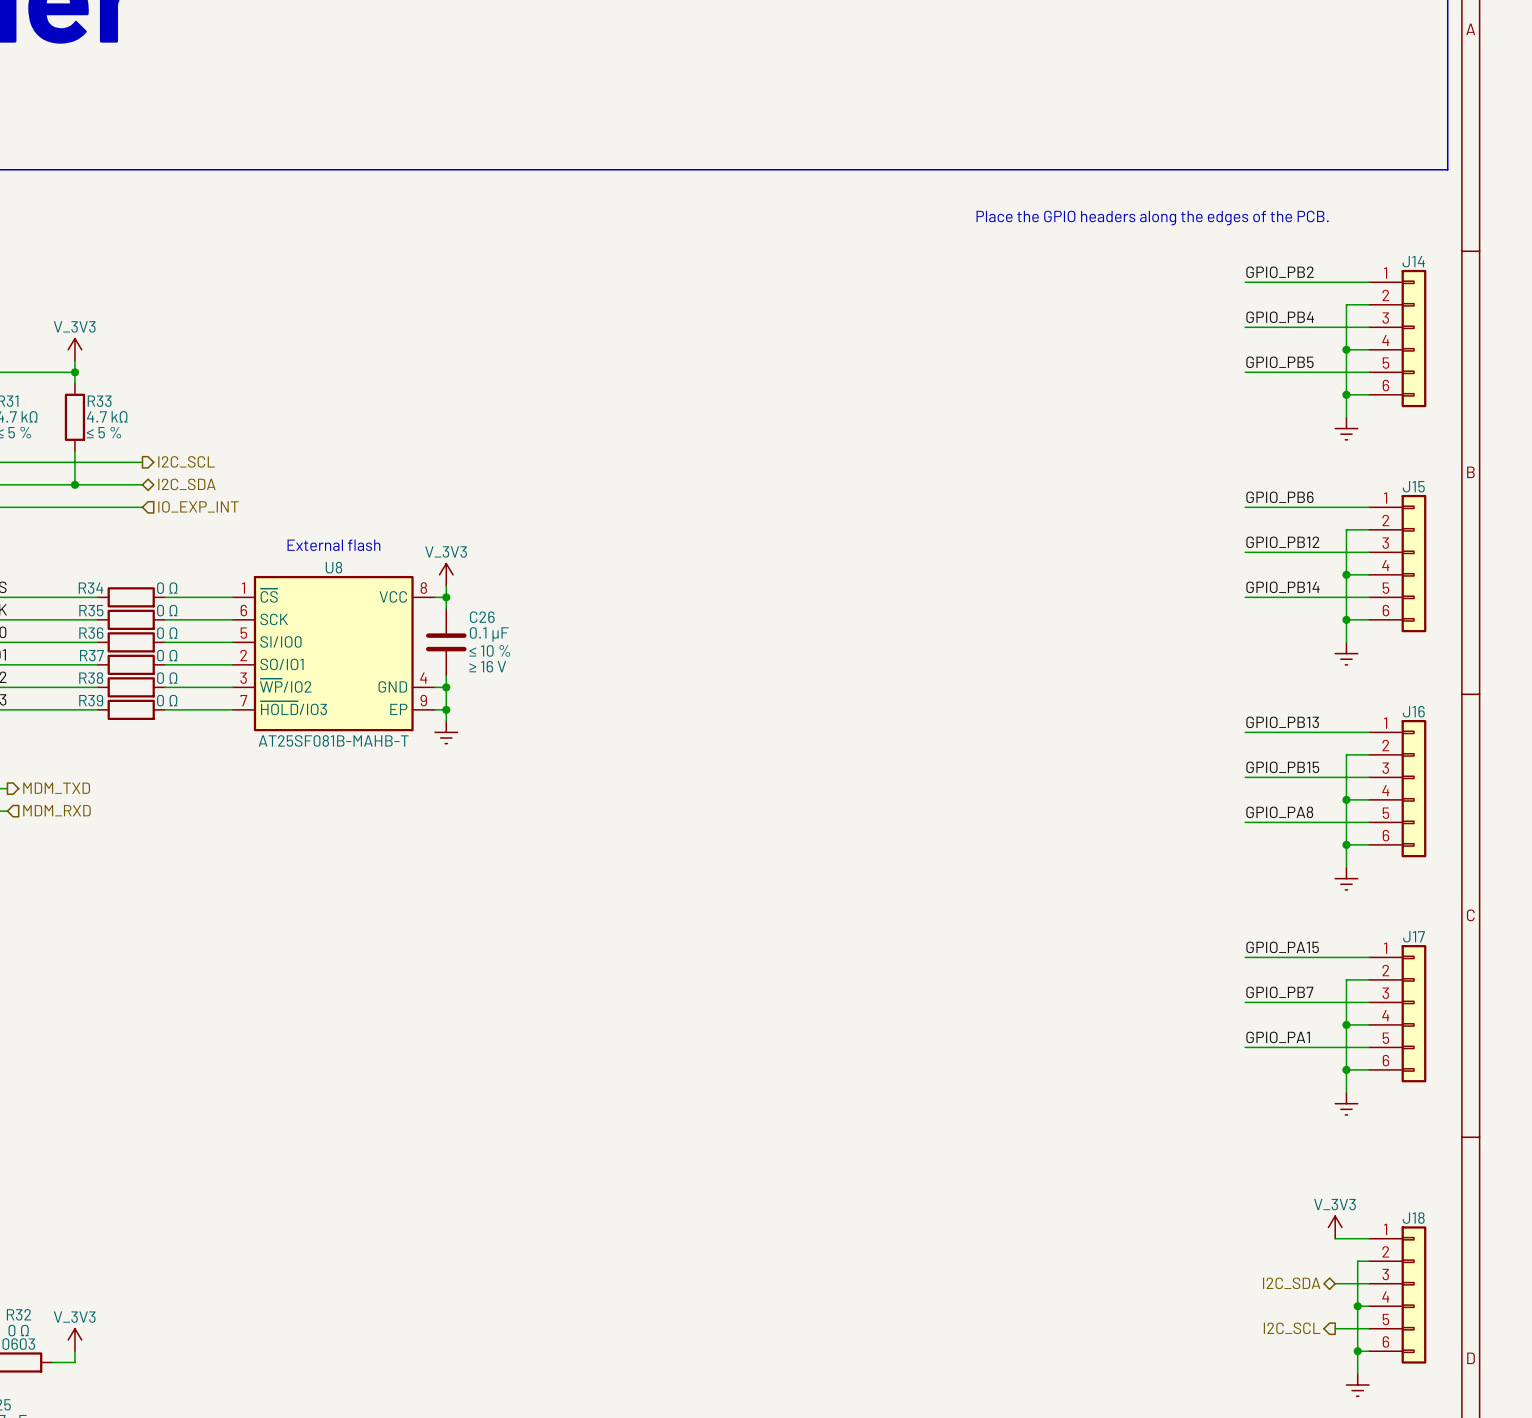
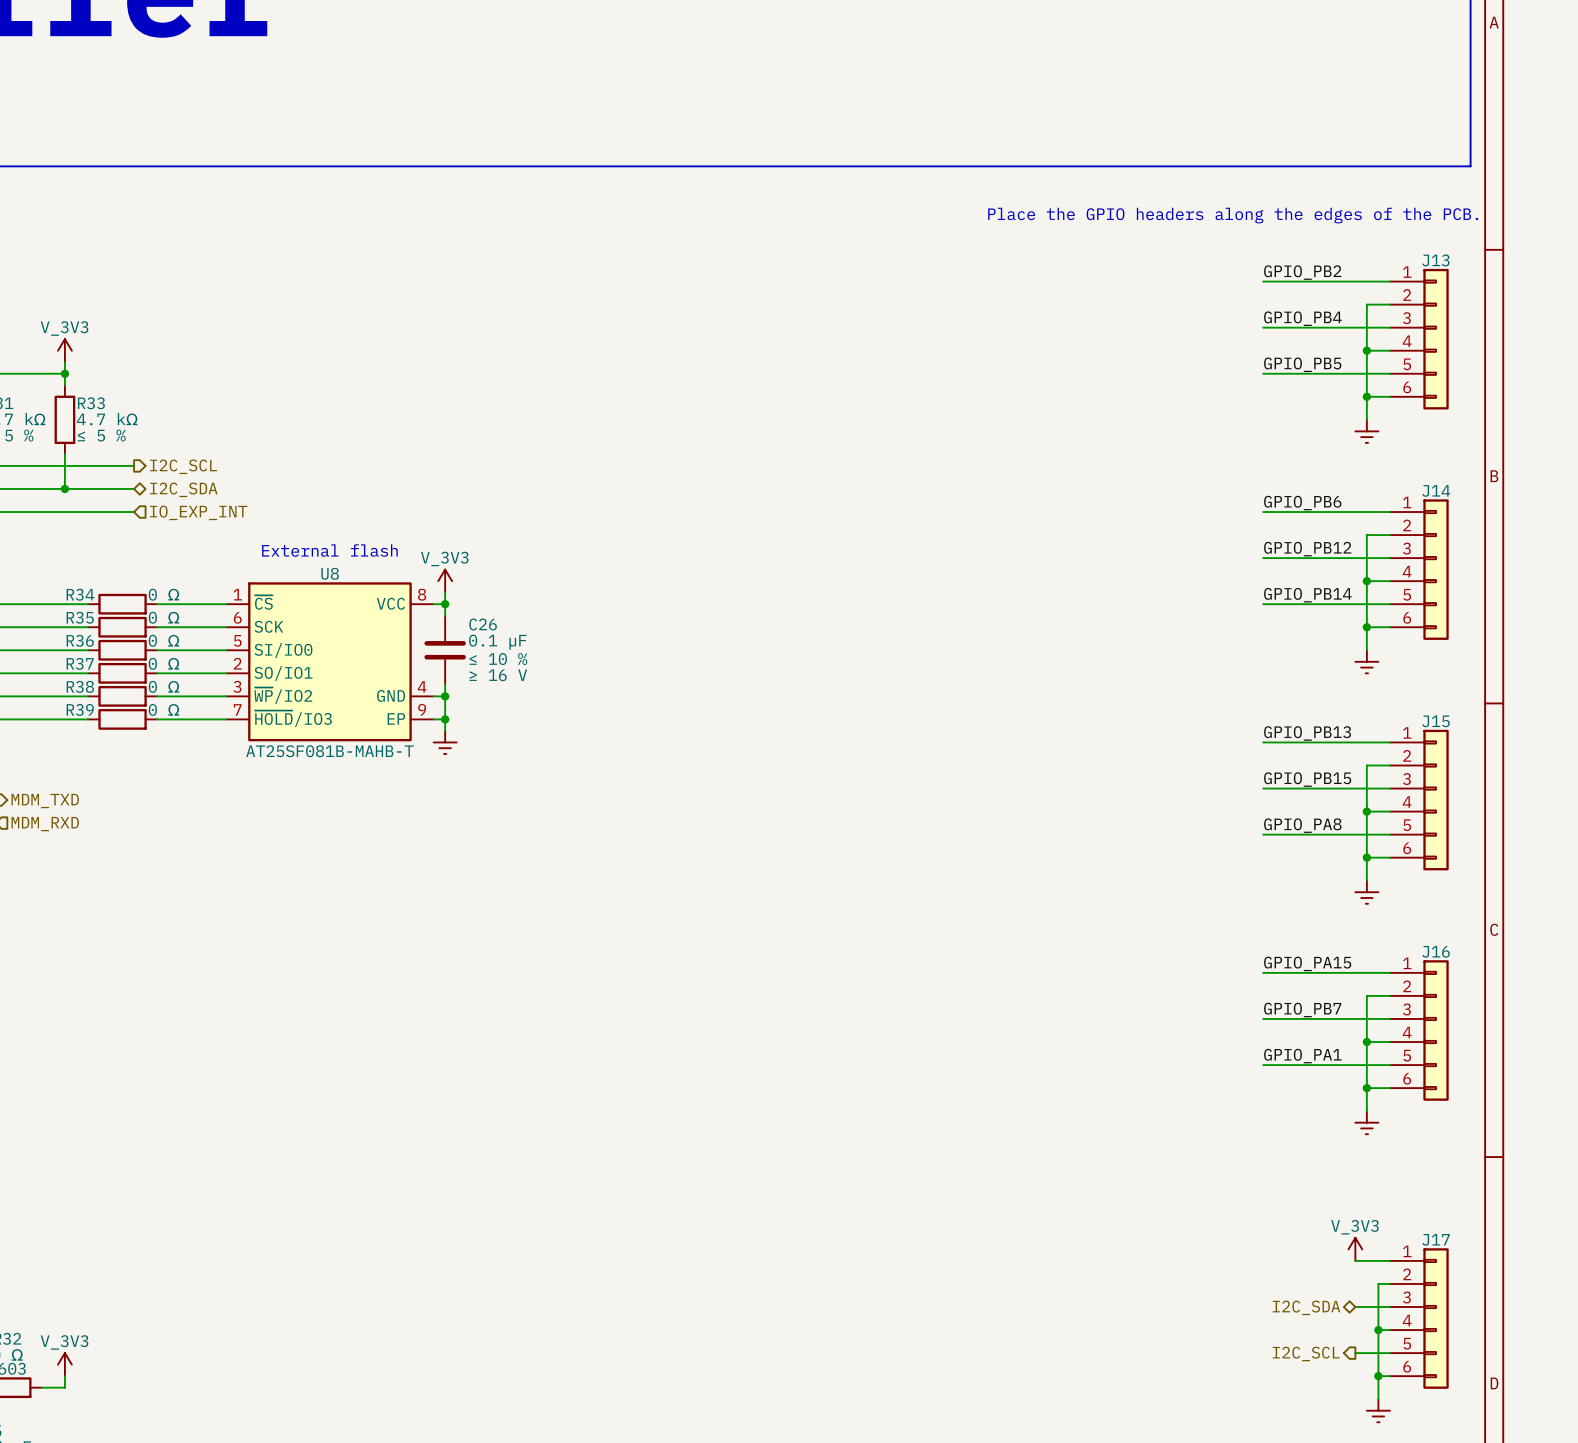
J14 name: J14 (1413, 261) -> J13 (1435, 260)
J15 name: J15 (1413, 486) -> J14 (1436, 490)
J16 name: J16 (1413, 711) -> J15 (1436, 721)
J17 name: J17 (1414, 936) -> J16 (1436, 951)
J18 name: J18 (1413, 1218) -> J17 (1436, 1239)

